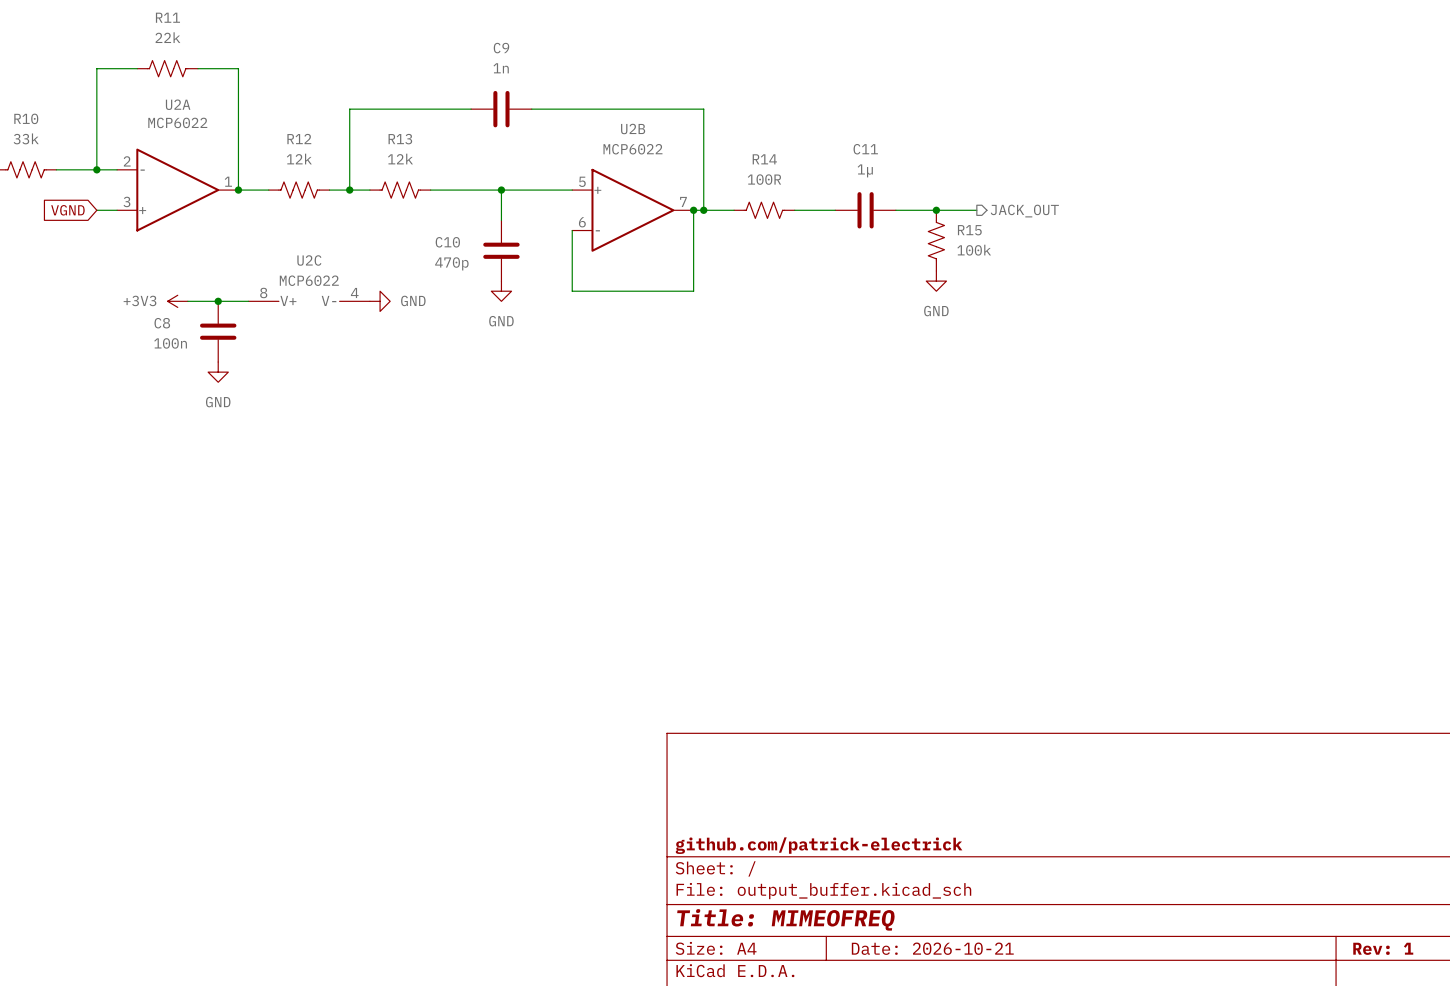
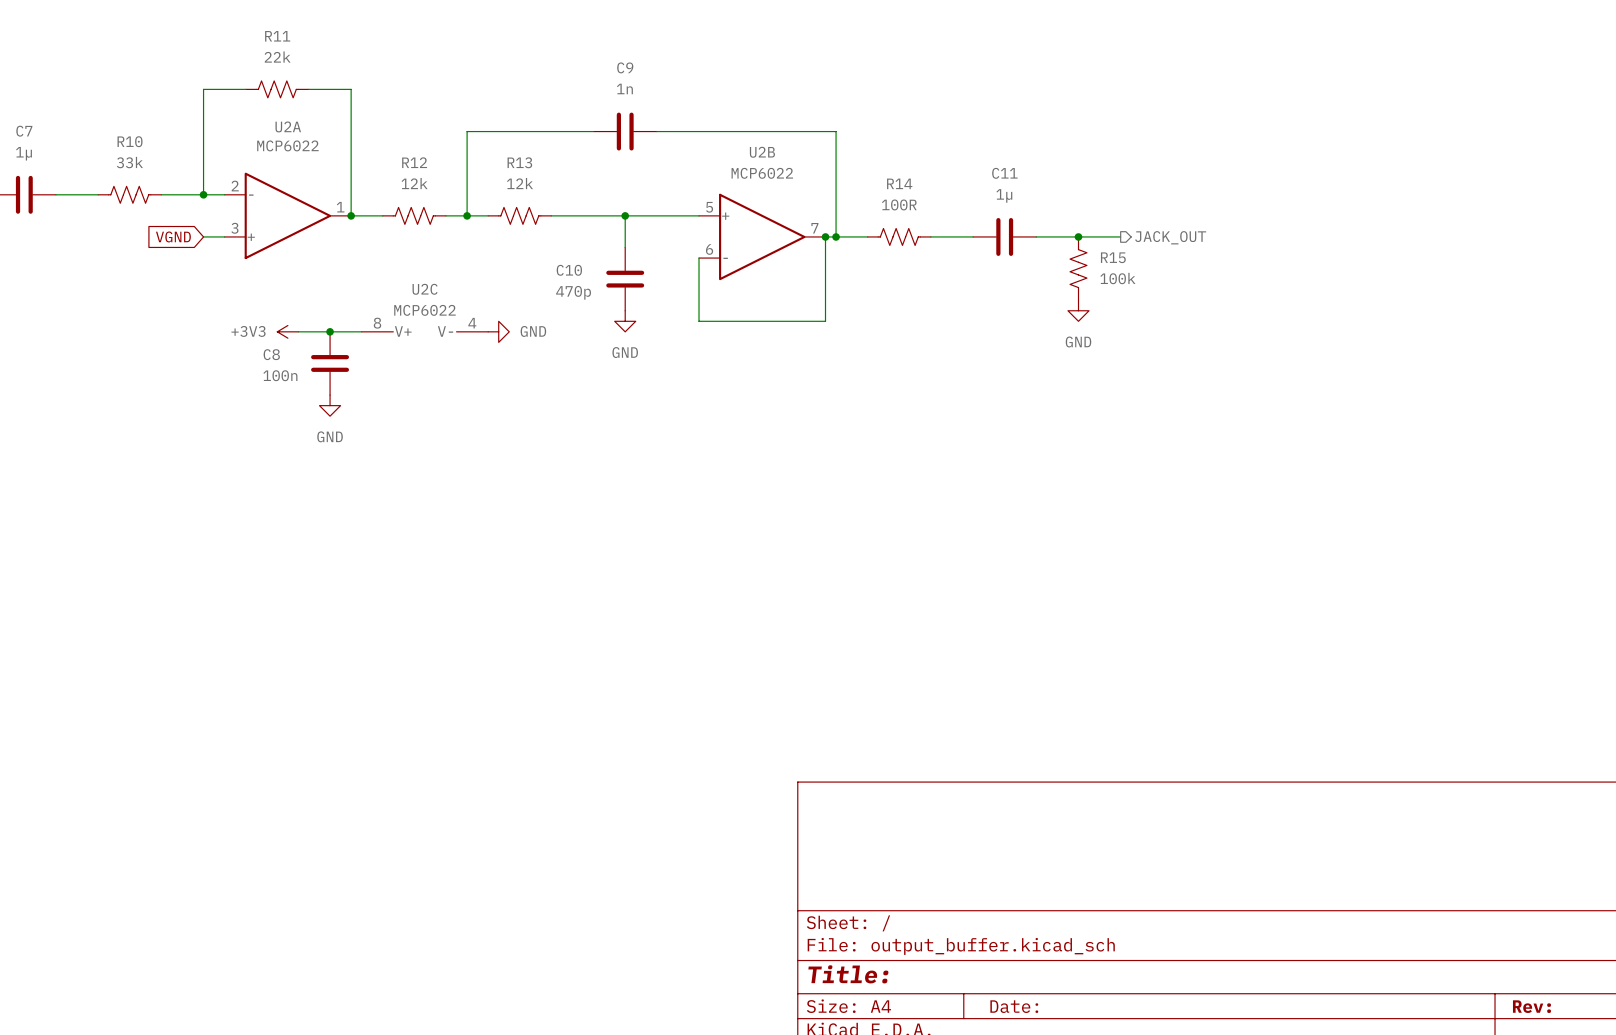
title block: github.com/patrick-electrick (819, 845) -> none
title block: Title: MIMEOFREQ (786, 919) -> Title: (848, 974)
title block: Date: 2026-10-21 (932, 948) -> Date: (1014, 1006)
title block: Rev: 1 (1383, 948) -> Rev: (1531, 1006)

